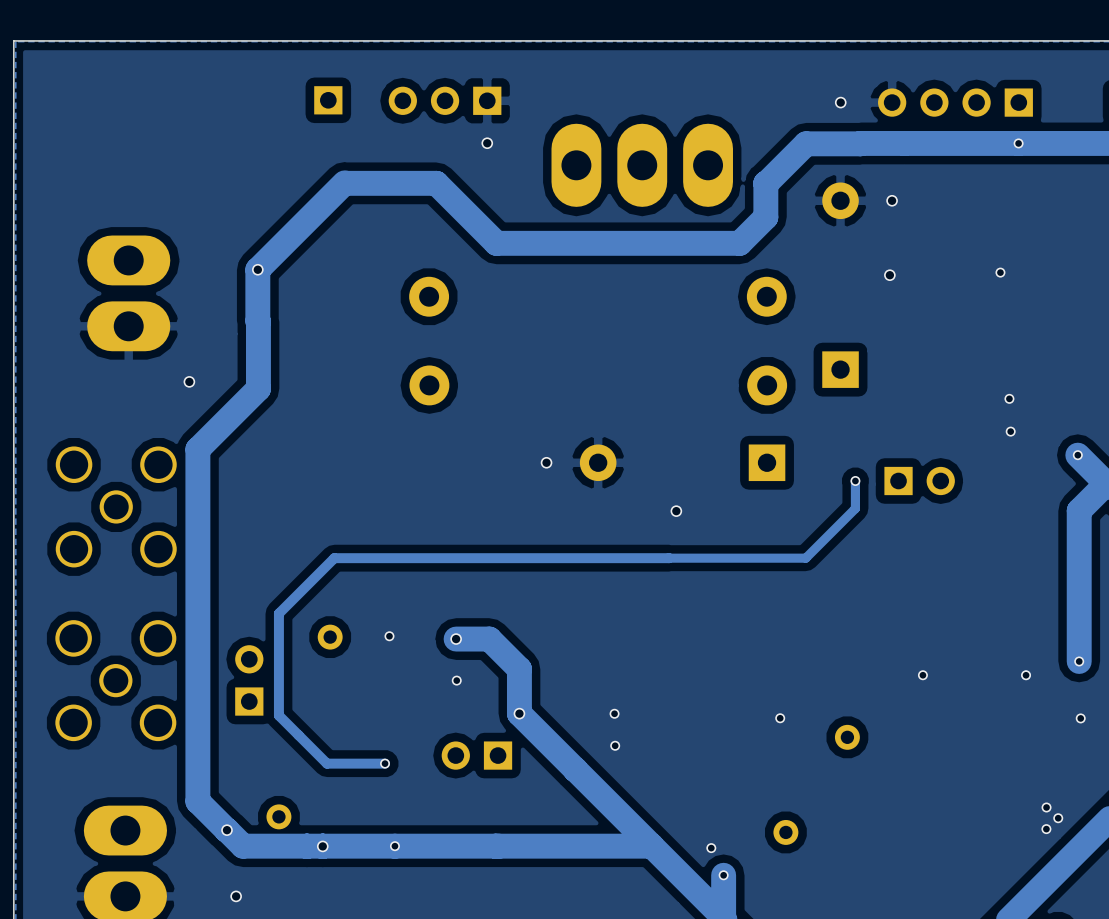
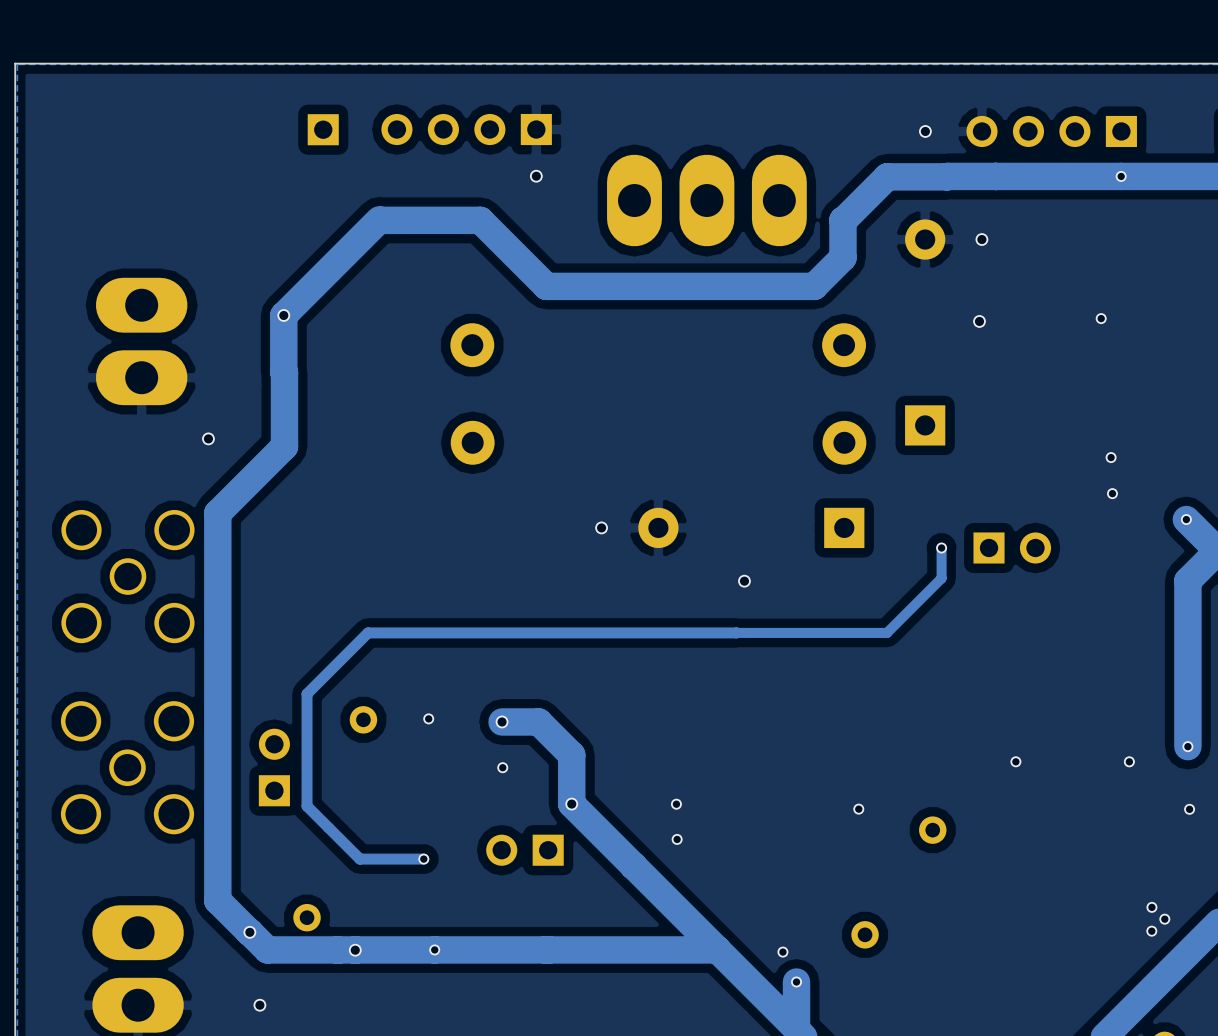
part position: (328, 100) -> (323, 129)
part: none -> (466, 129)

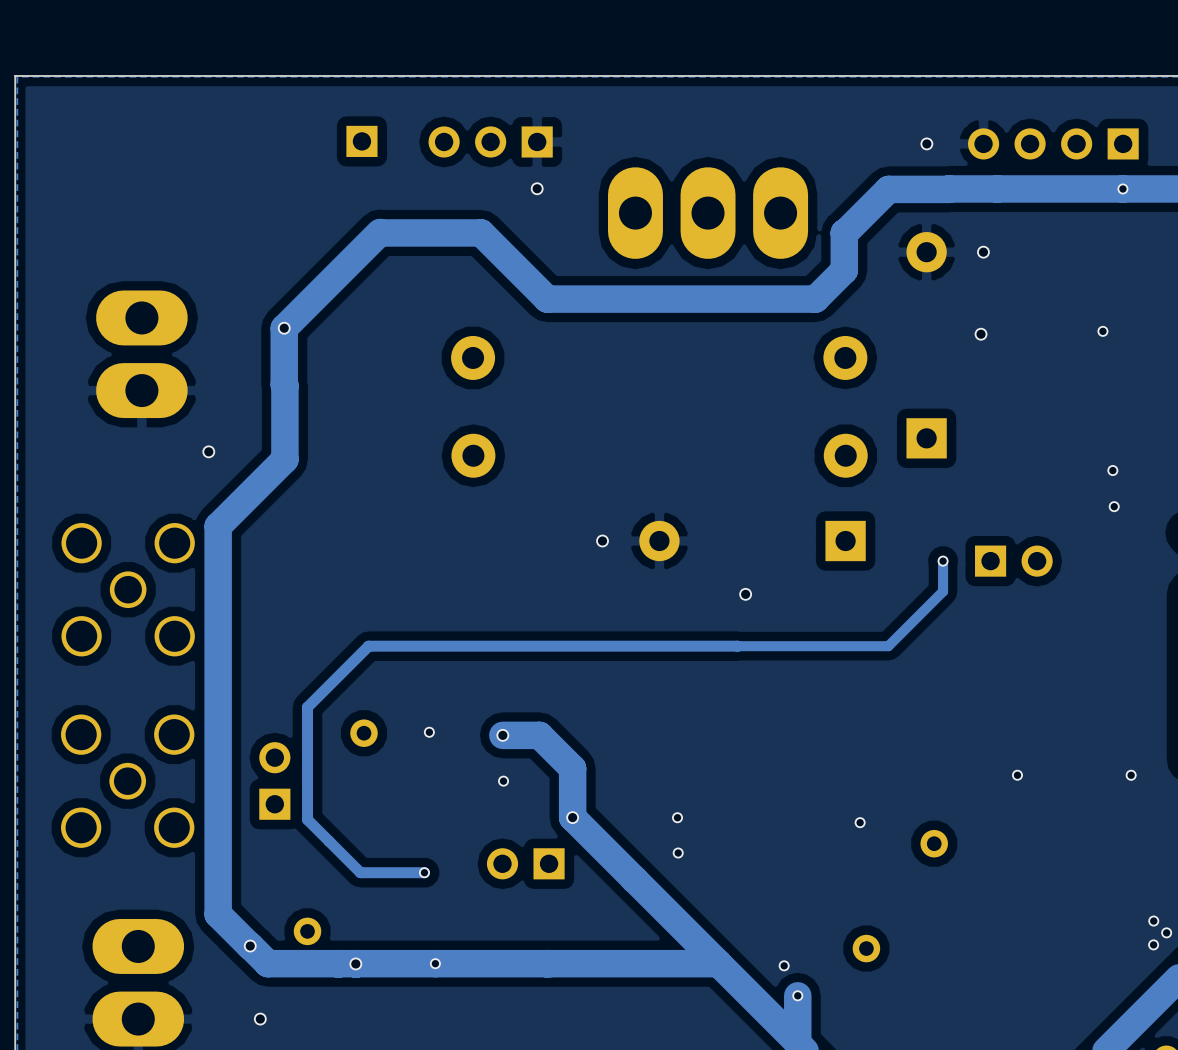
part position: (323, 129) -> (361, 141)
part: (466, 129) -> none

